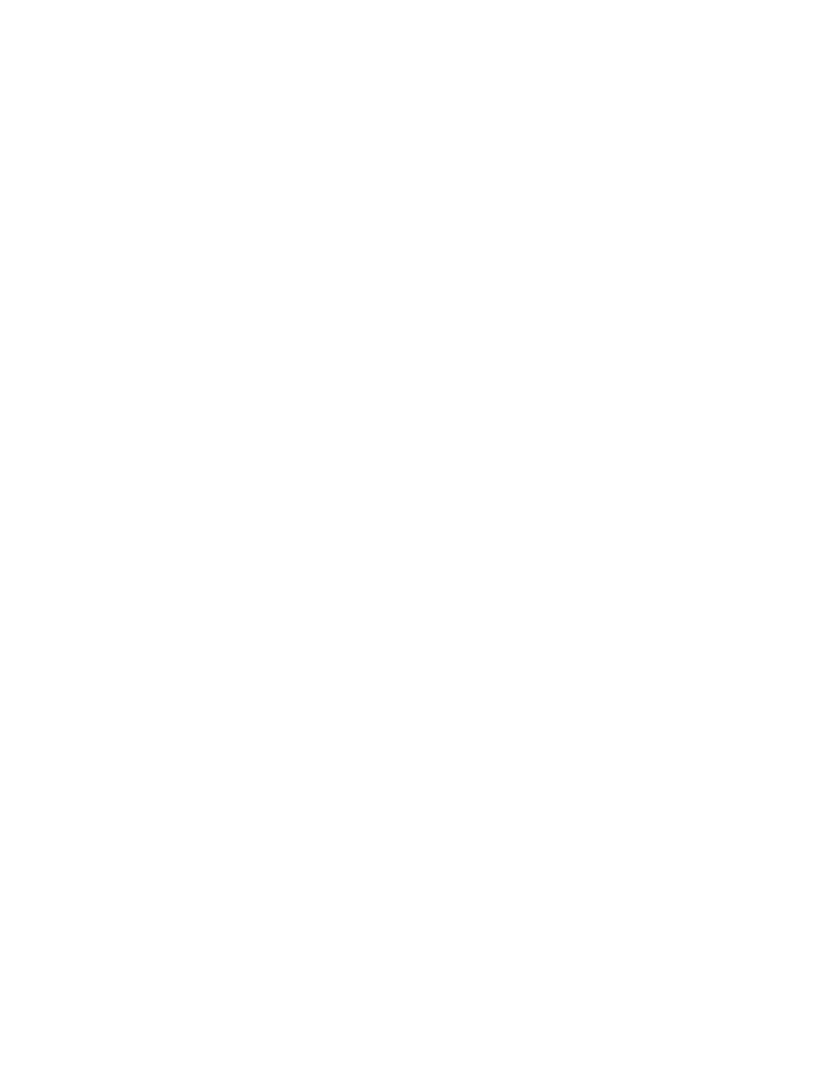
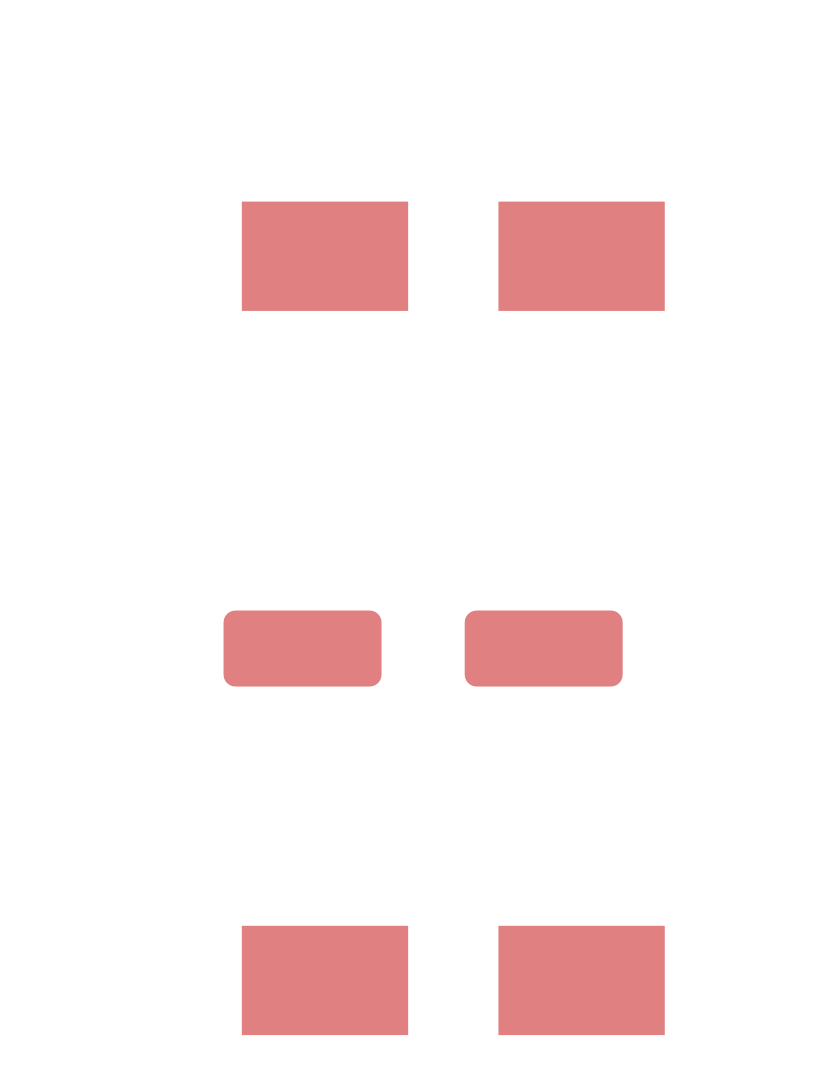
part: none -> (453, 256)
part: none -> (423, 648)
part: none -> (453, 980)

